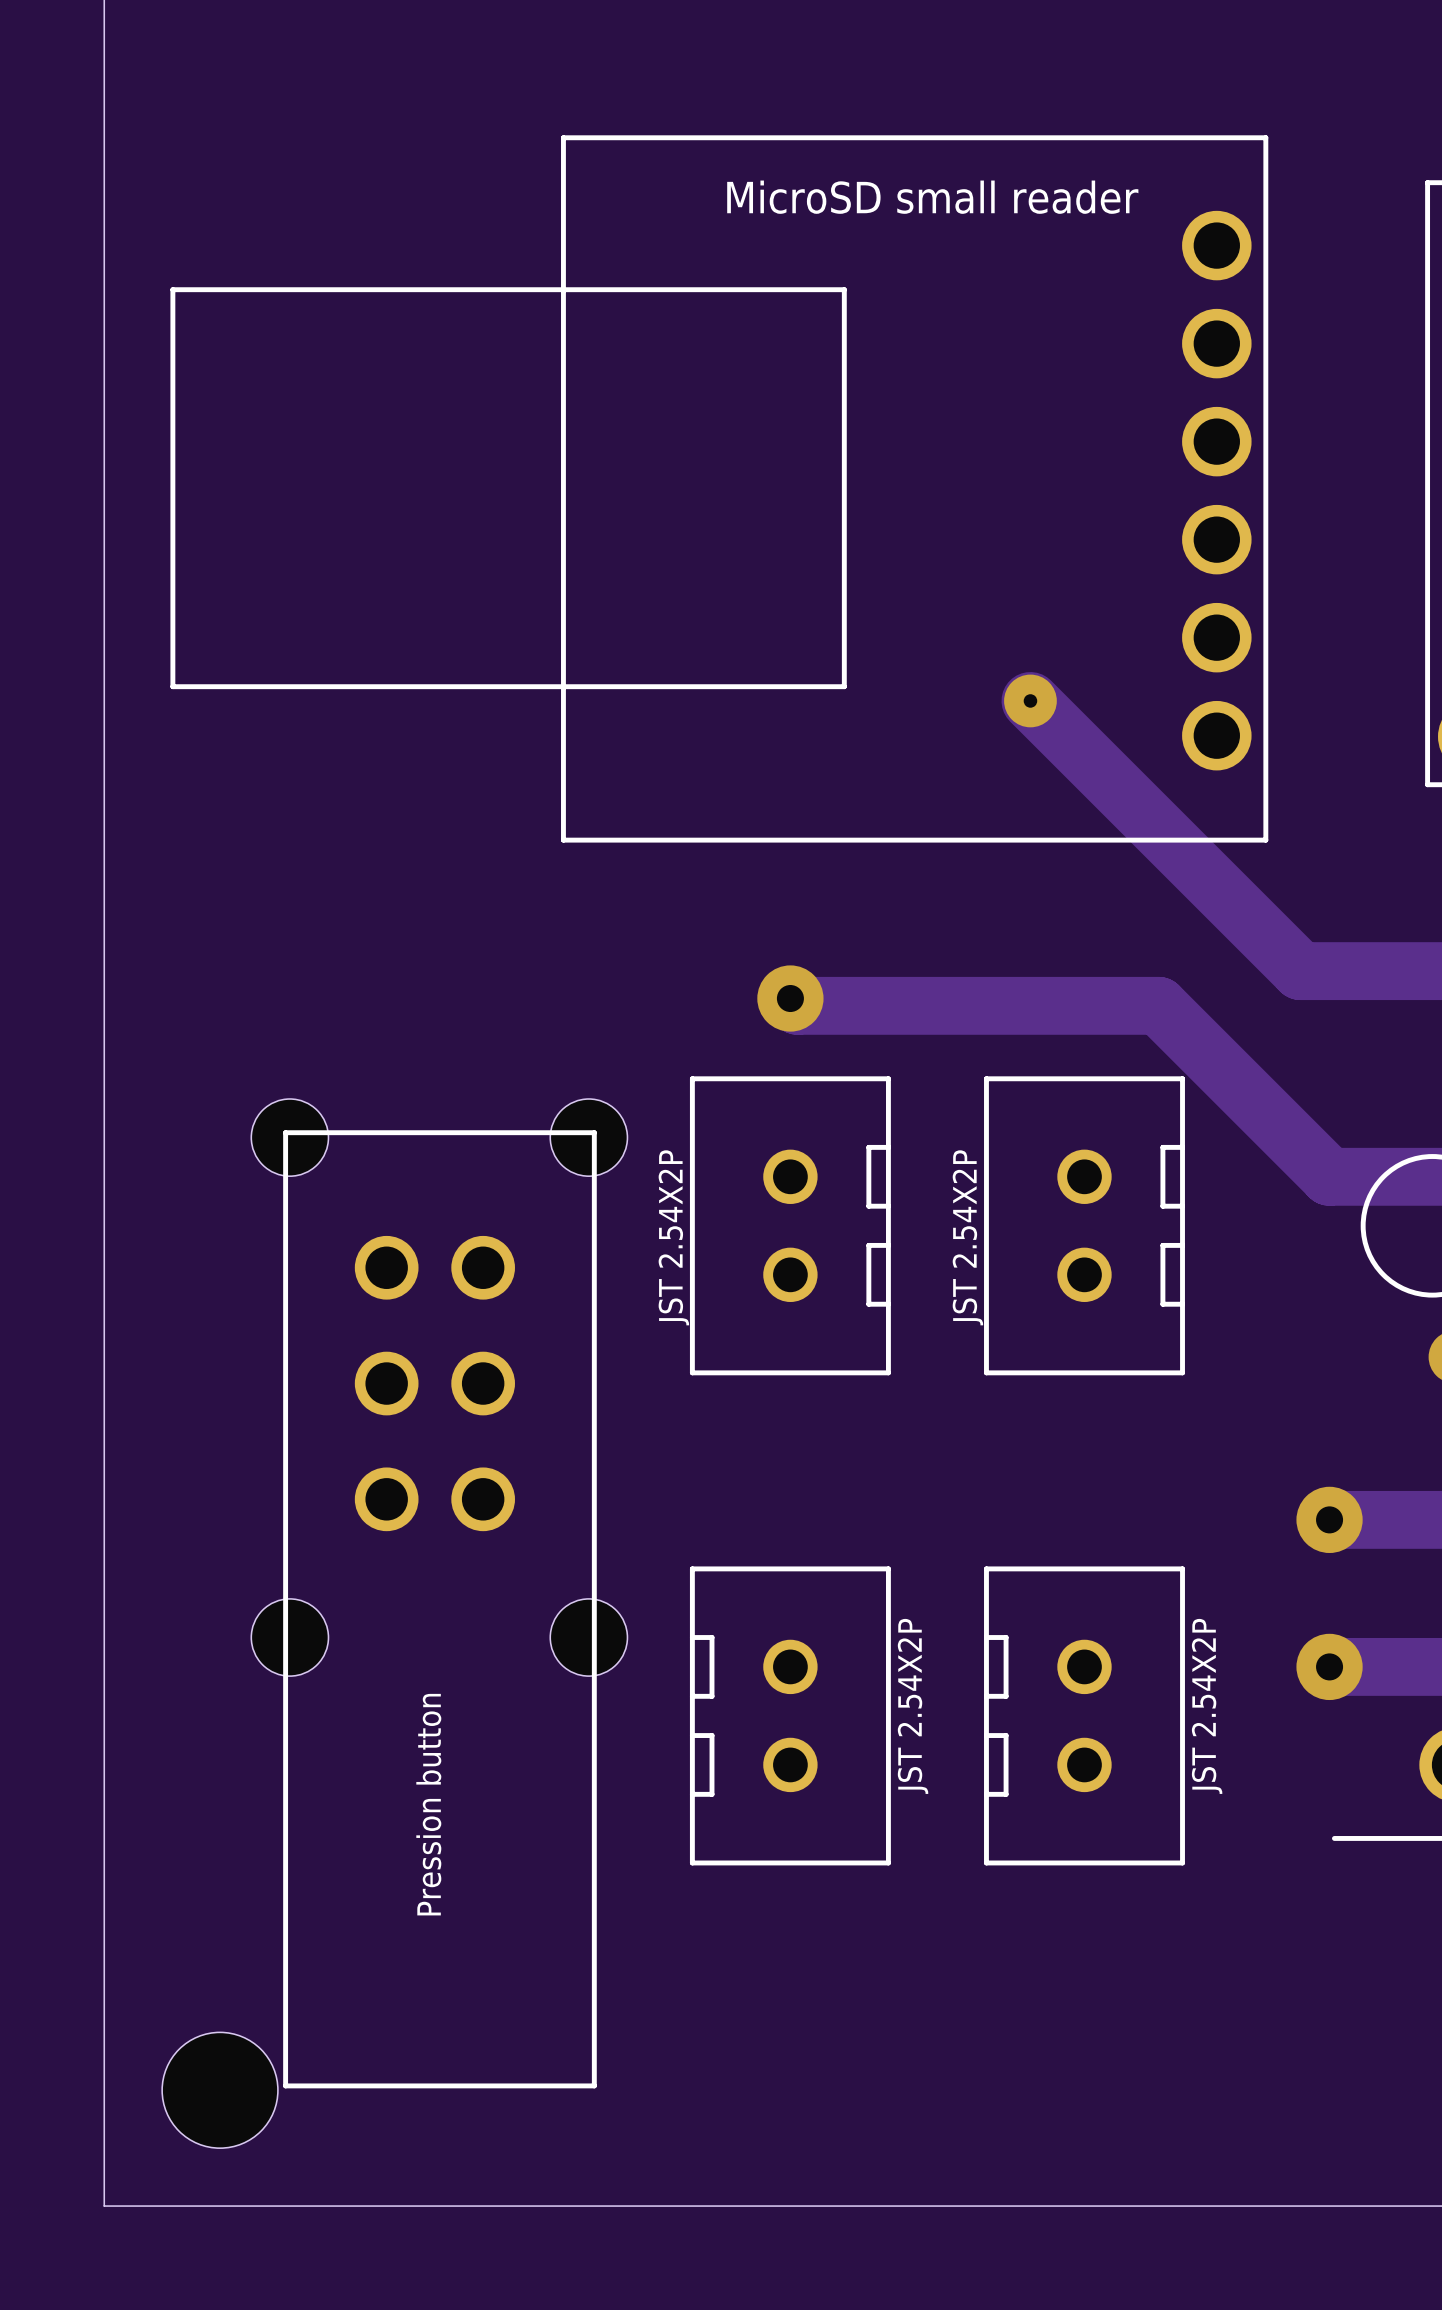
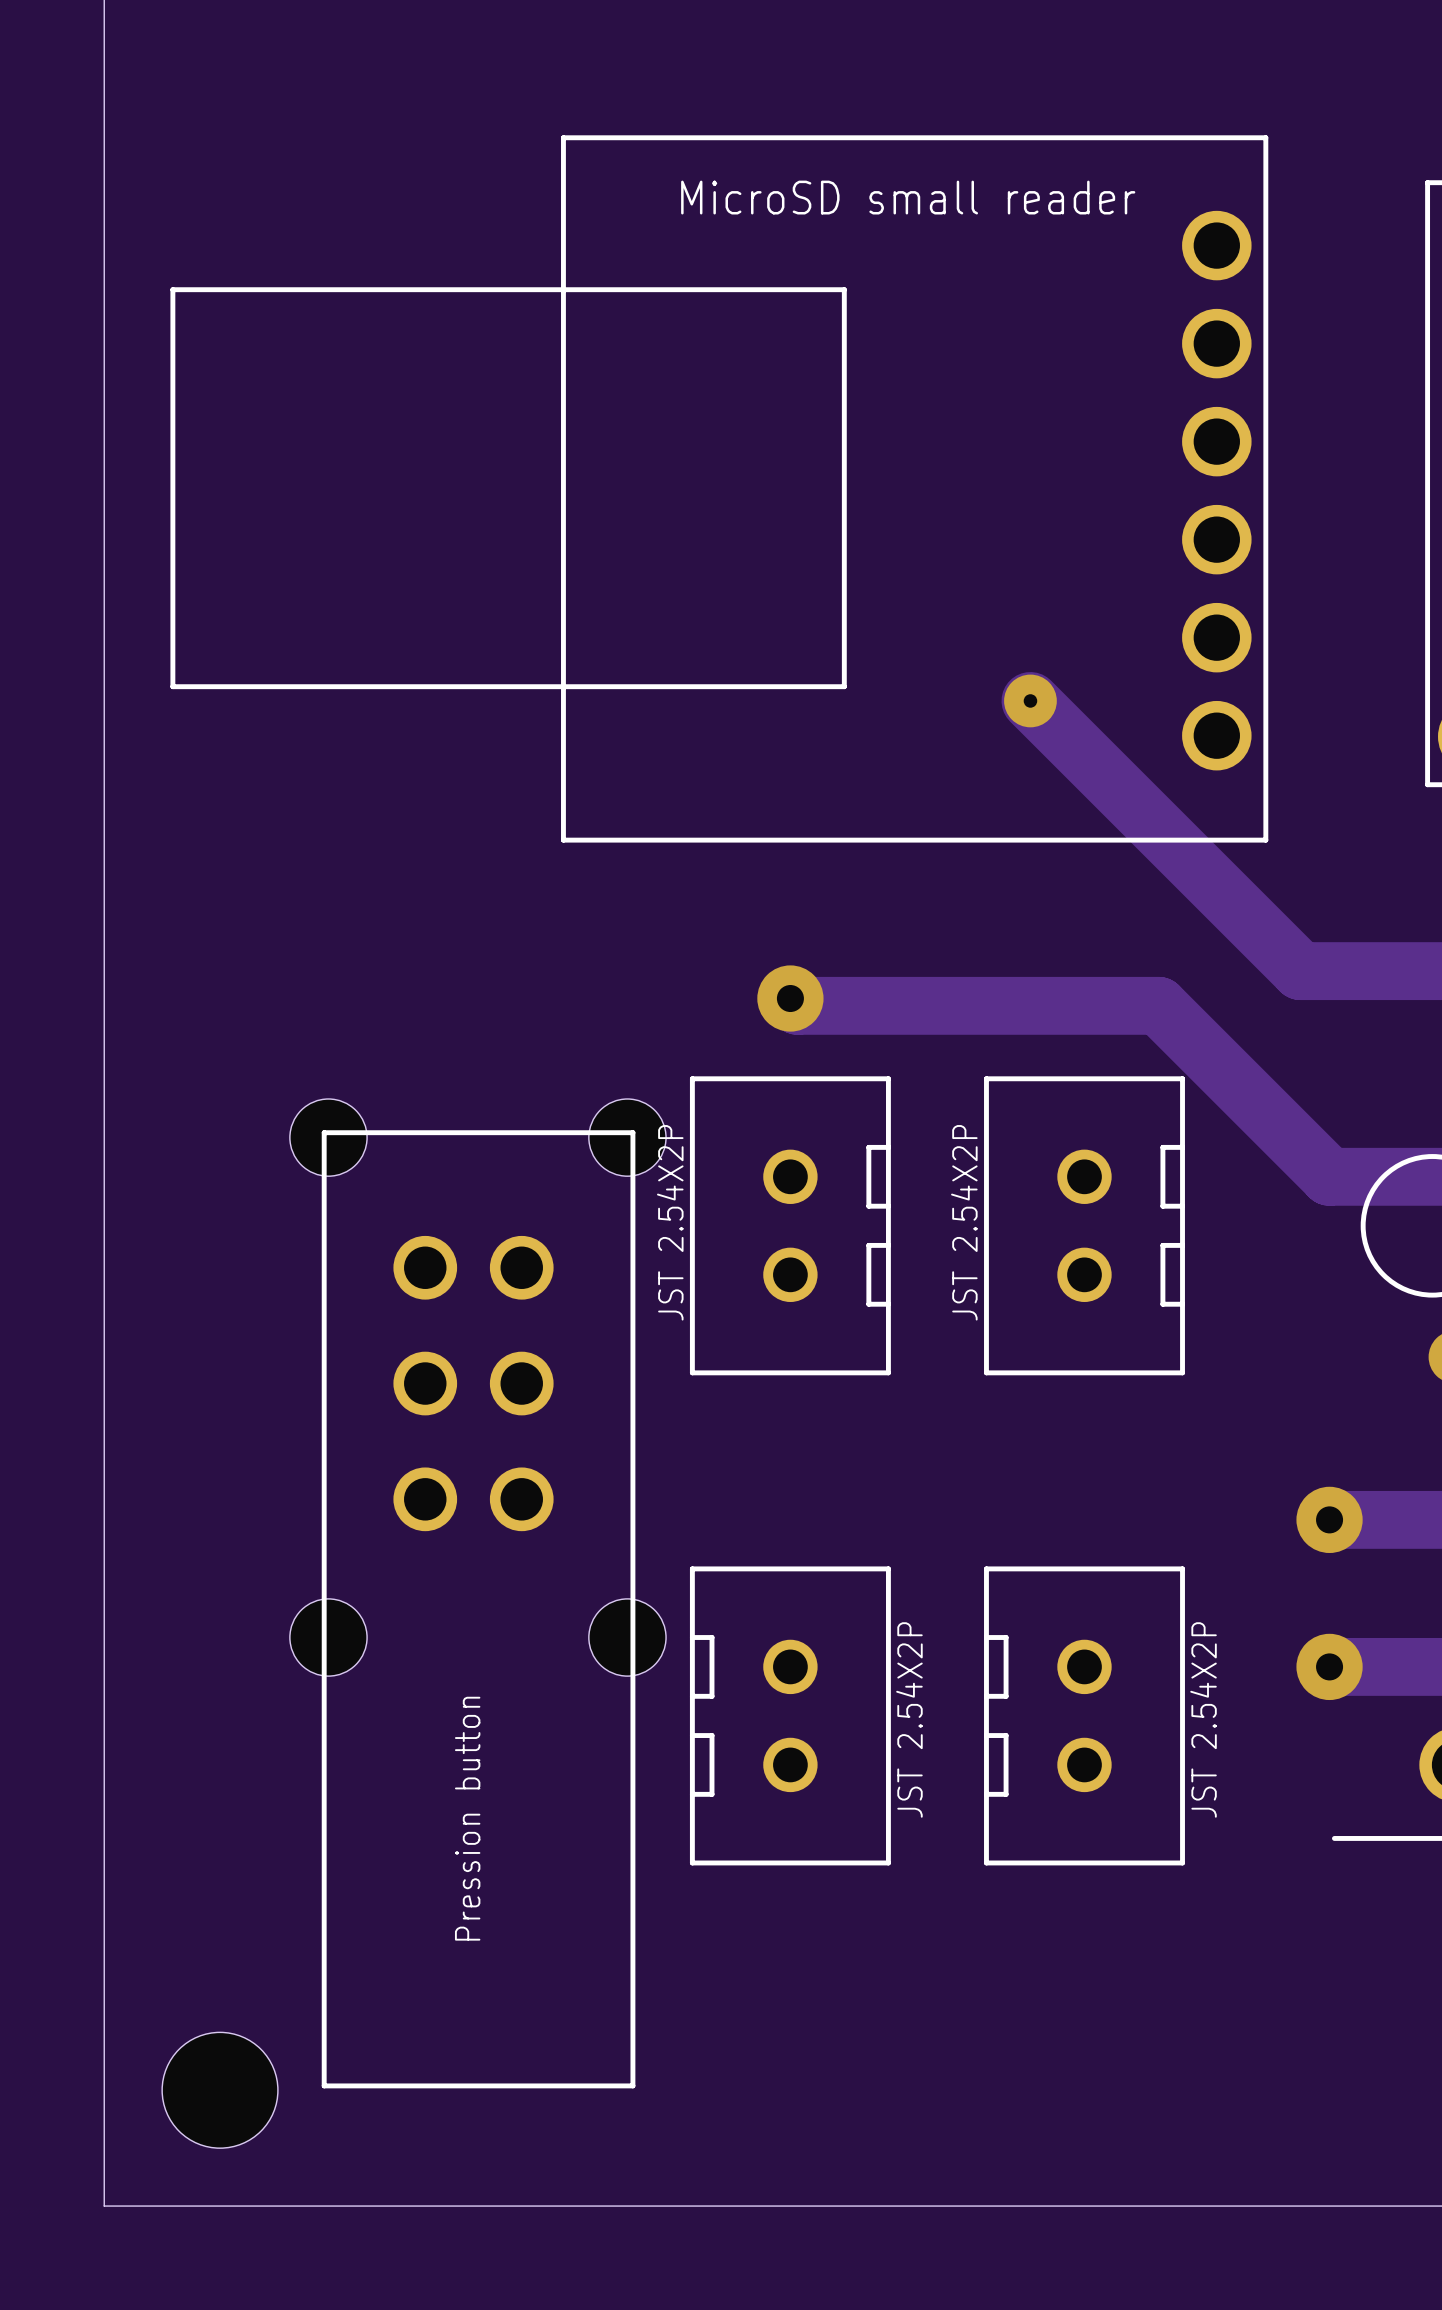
part position: (439, 1593) -> (477, 1593)

